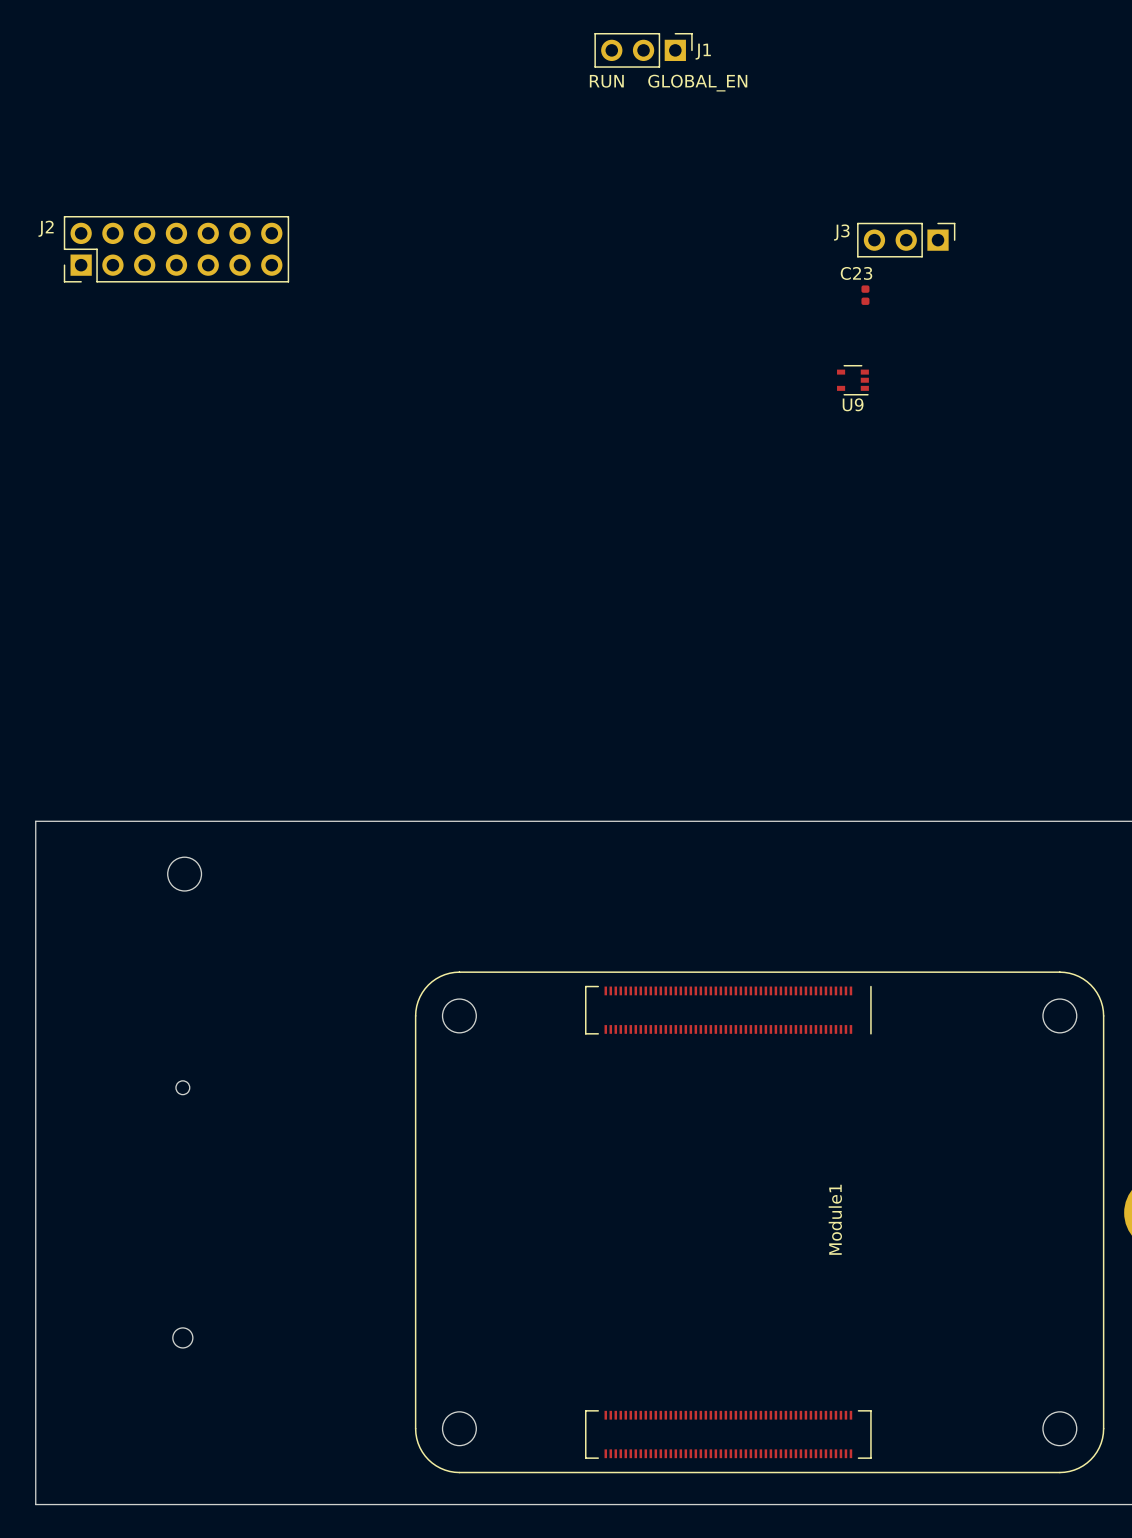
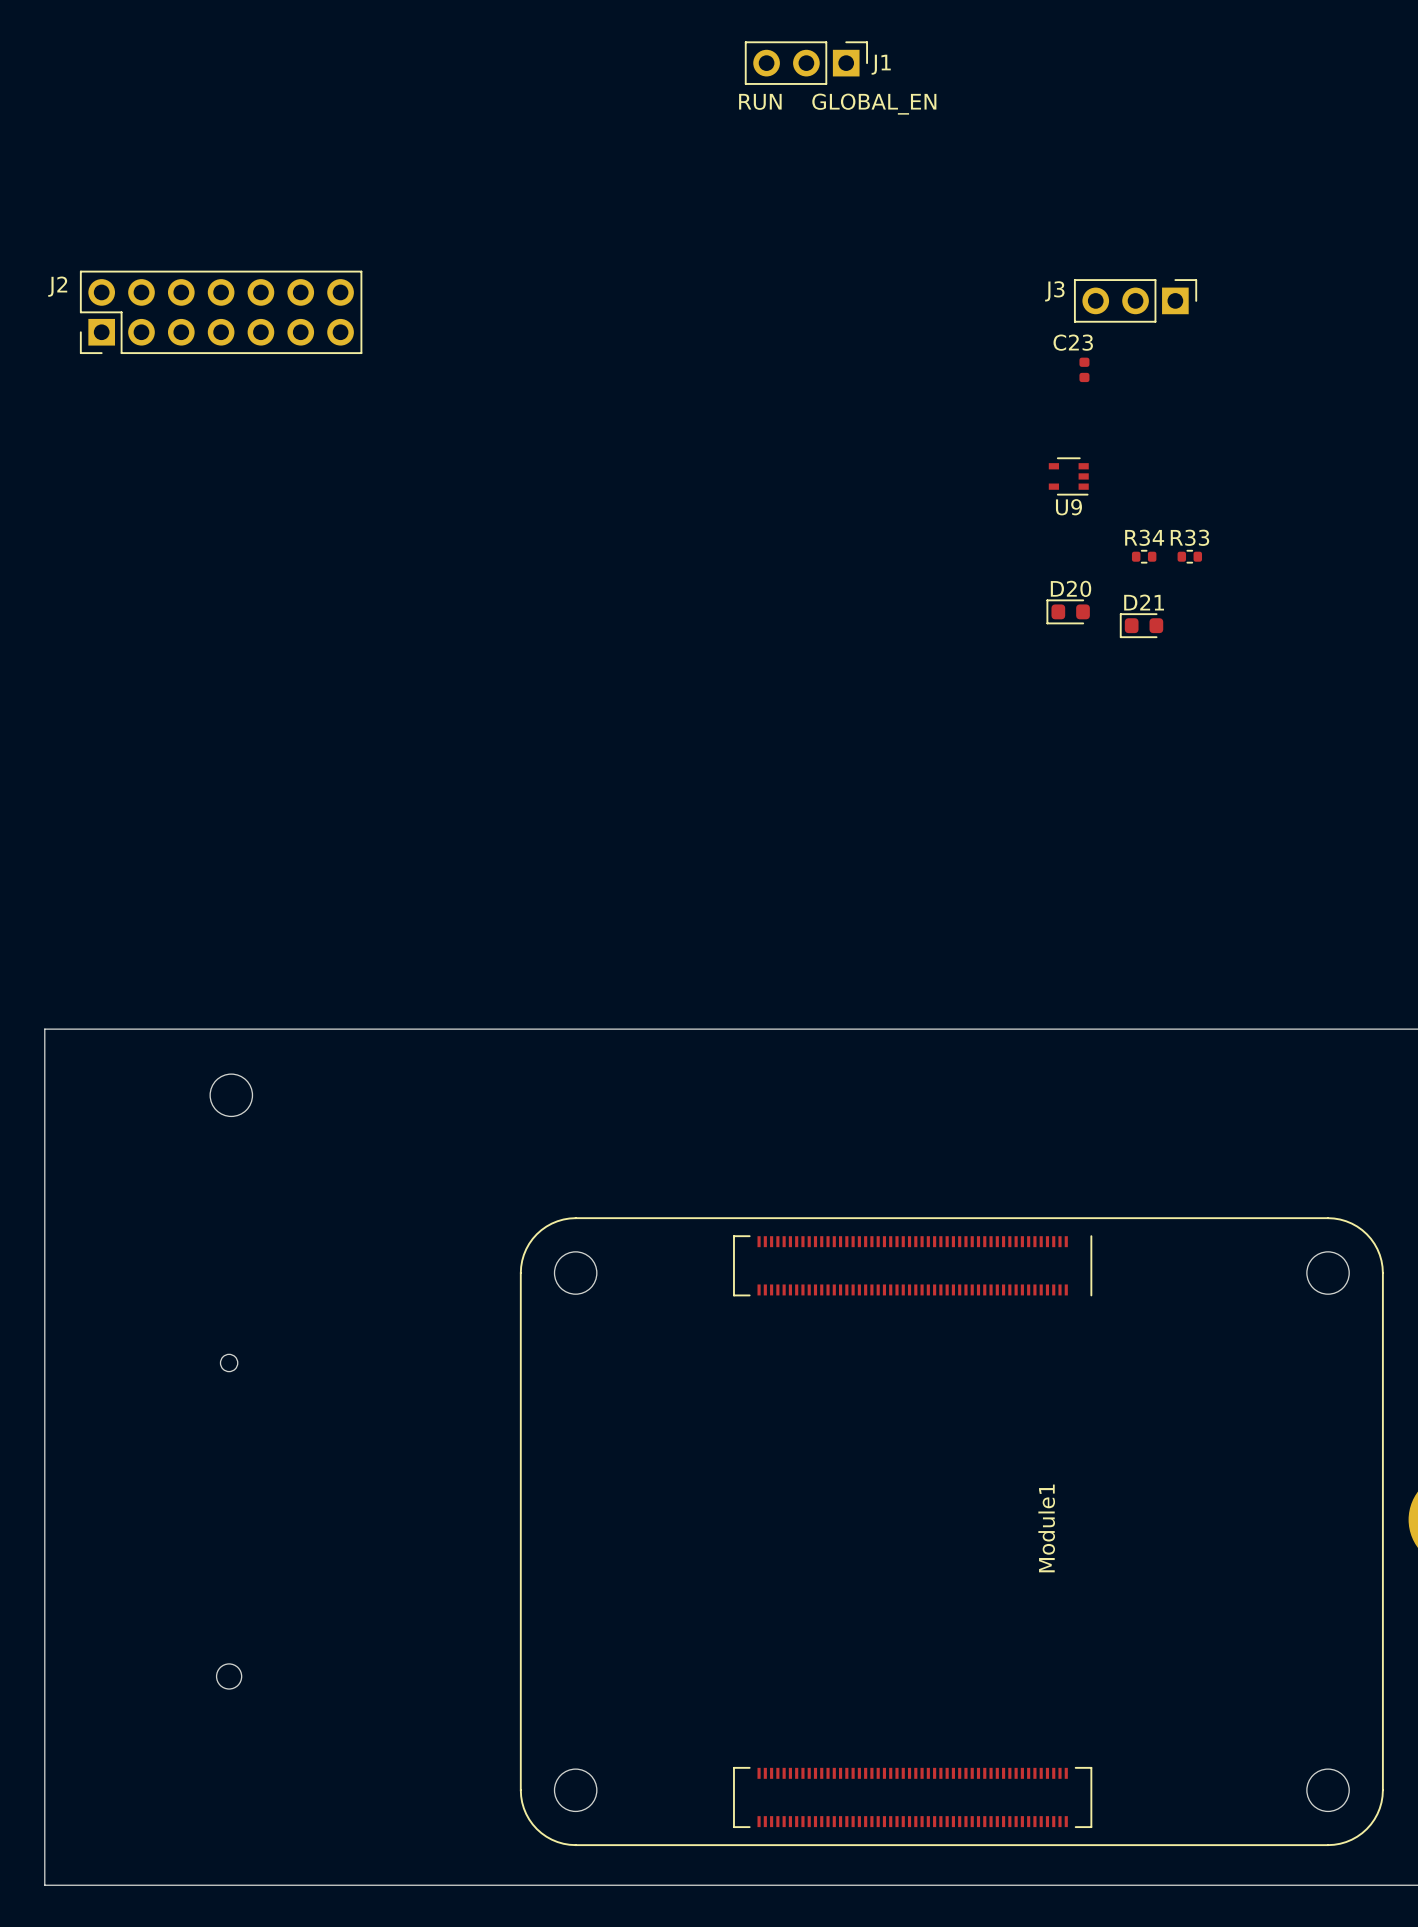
R34: none -> (1144, 556)
R33: none -> (1189, 556)
D20: none -> (1068, 611)
D21: none -> (1141, 625)

